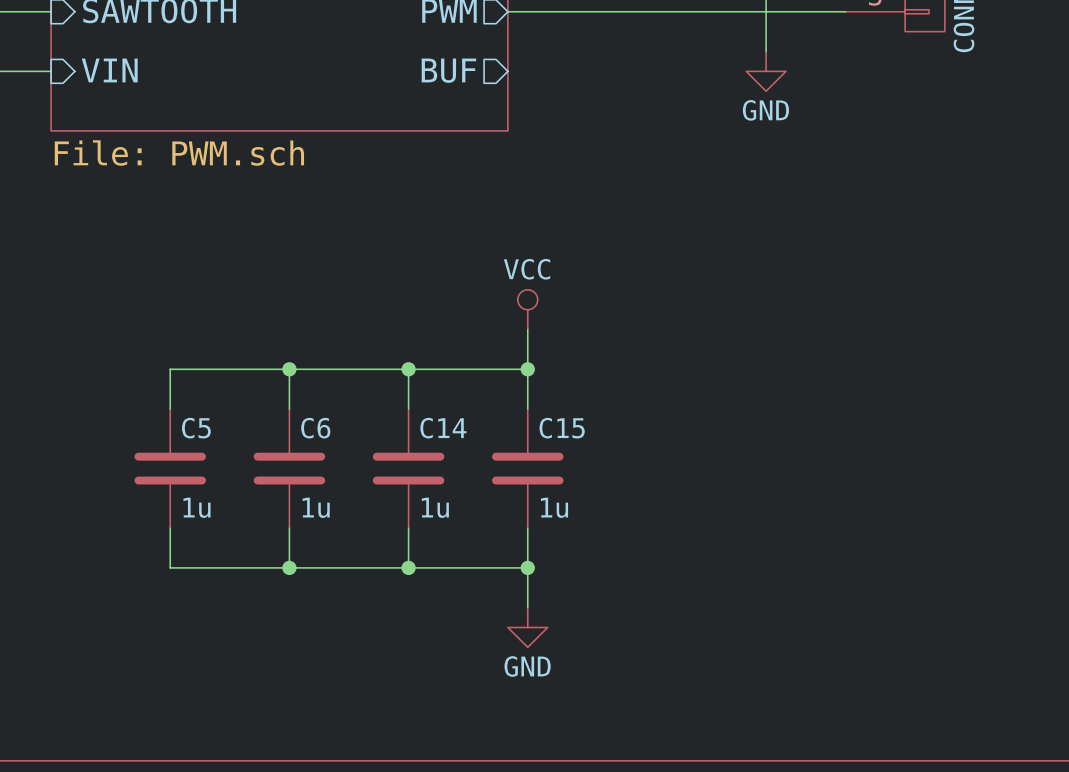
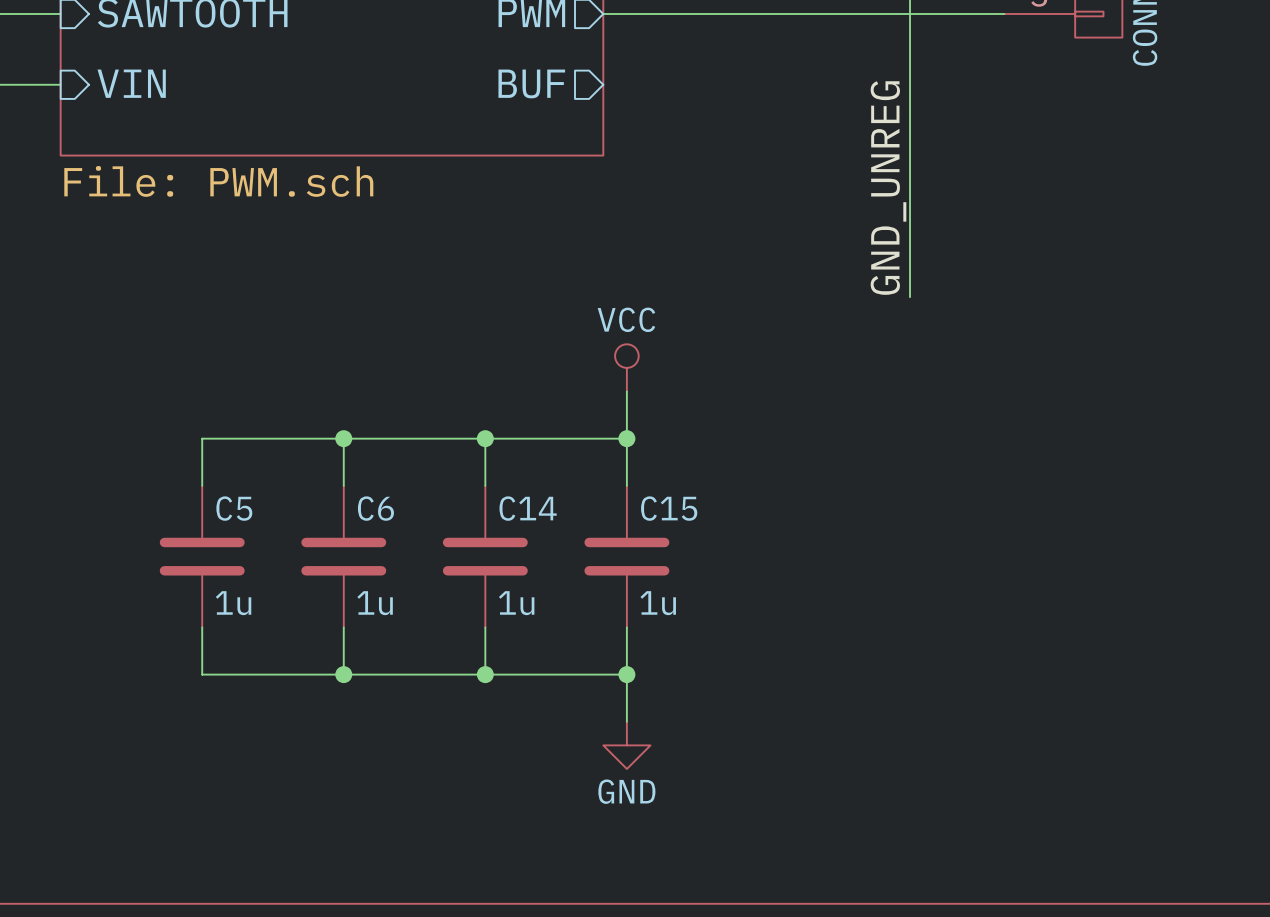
wire: none -> (910, 61) (910, 297)
power symbol: GND (766, 71) -> none
label: none -> GND_UNREG (888, 188)

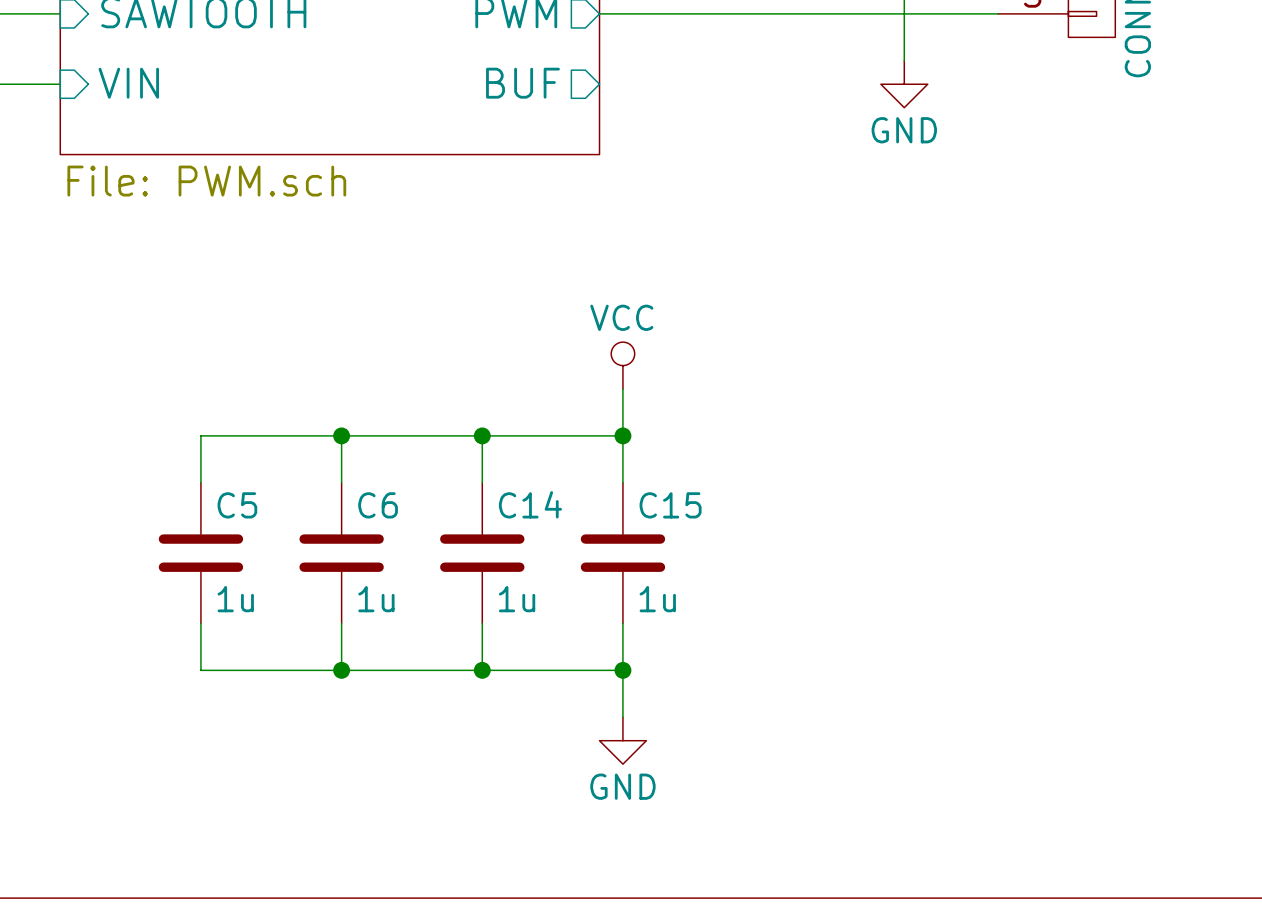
wire: (910, 61) (910, 297) -> none
power symbol: none -> GND (904, 84)
label: GND_UNREG (888, 188) -> none

